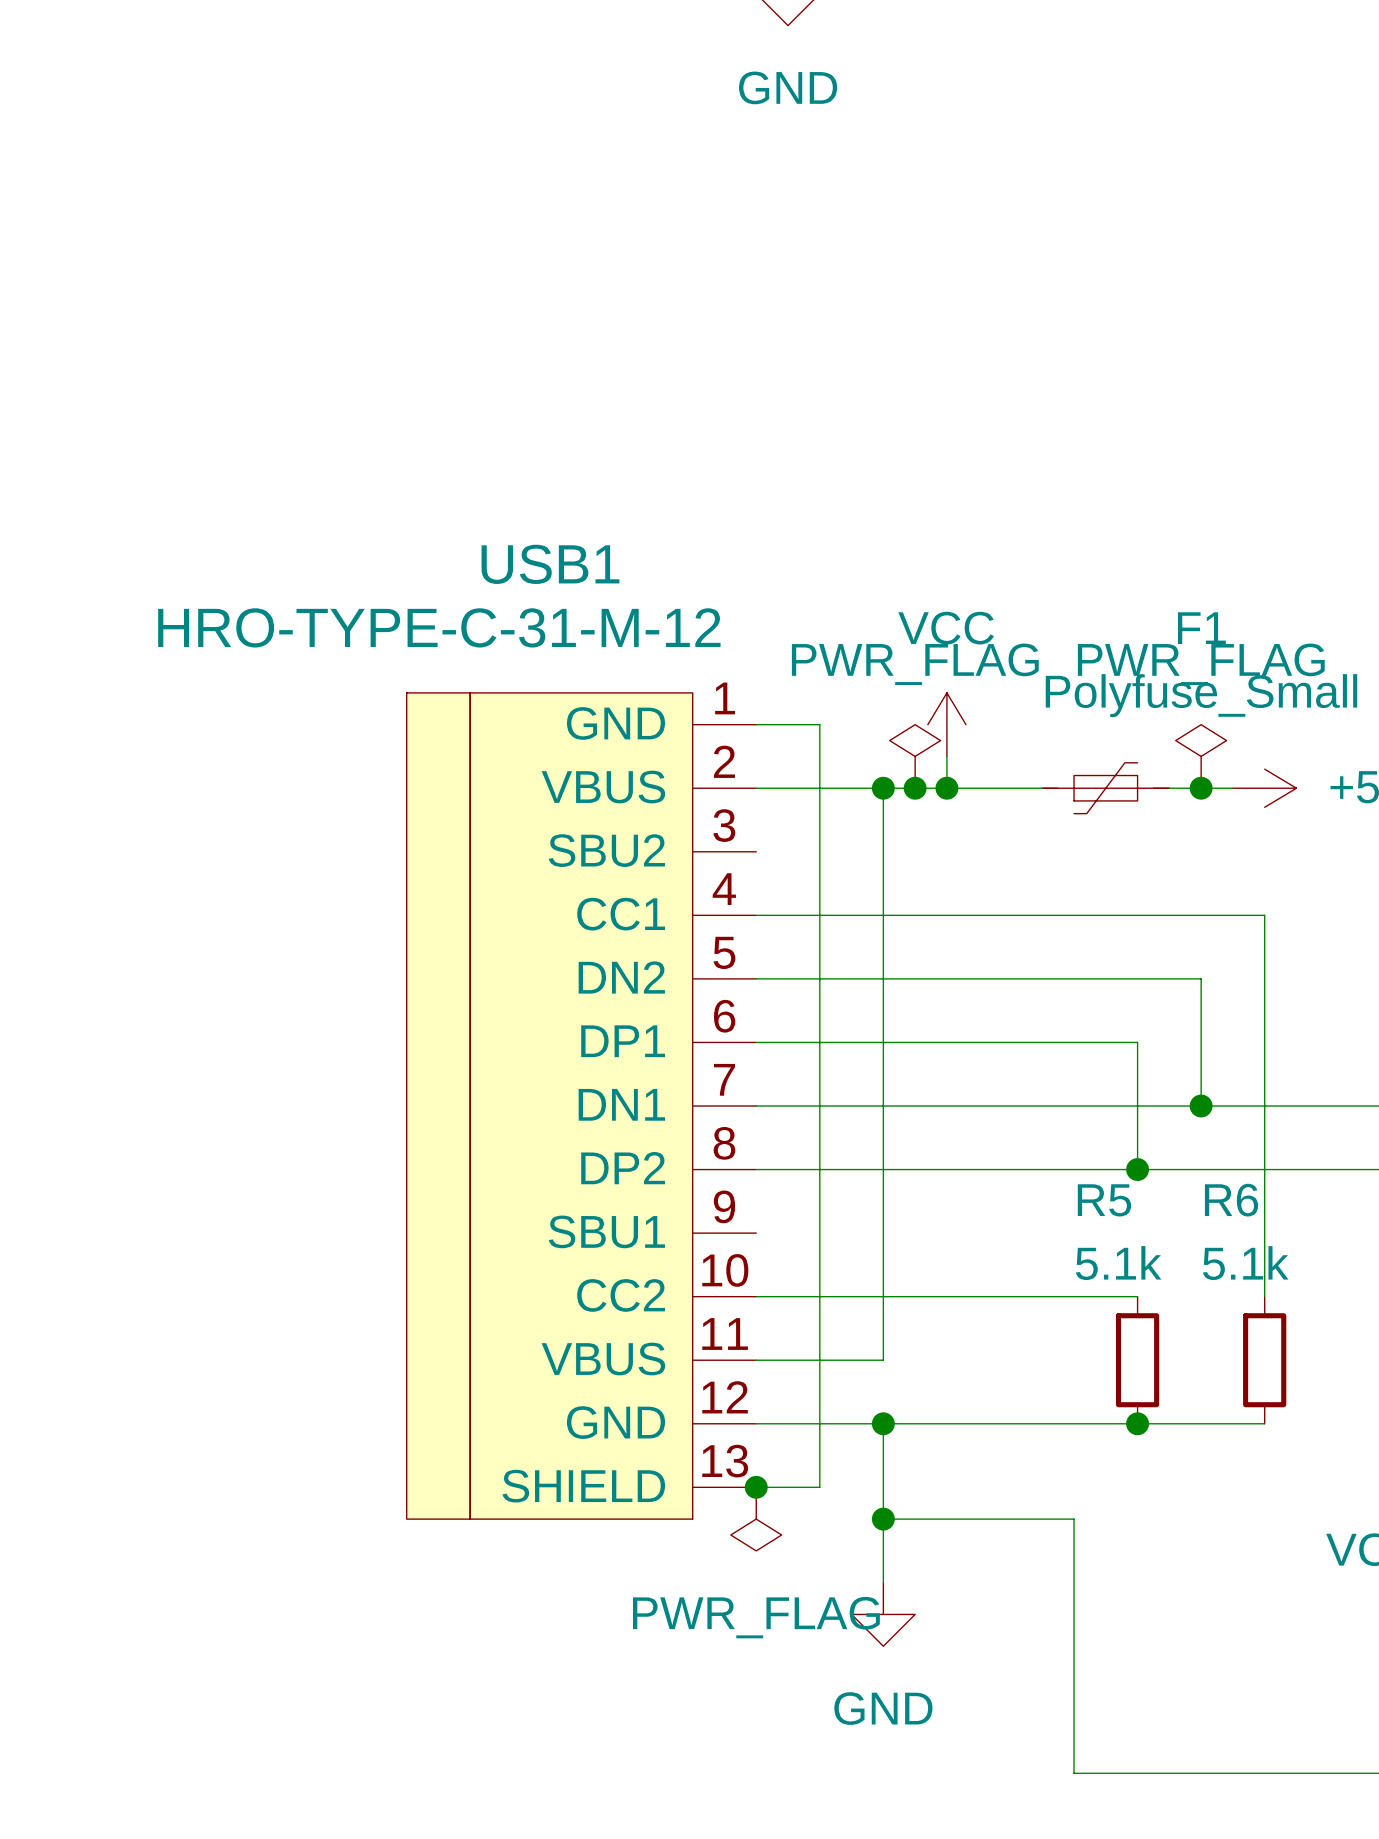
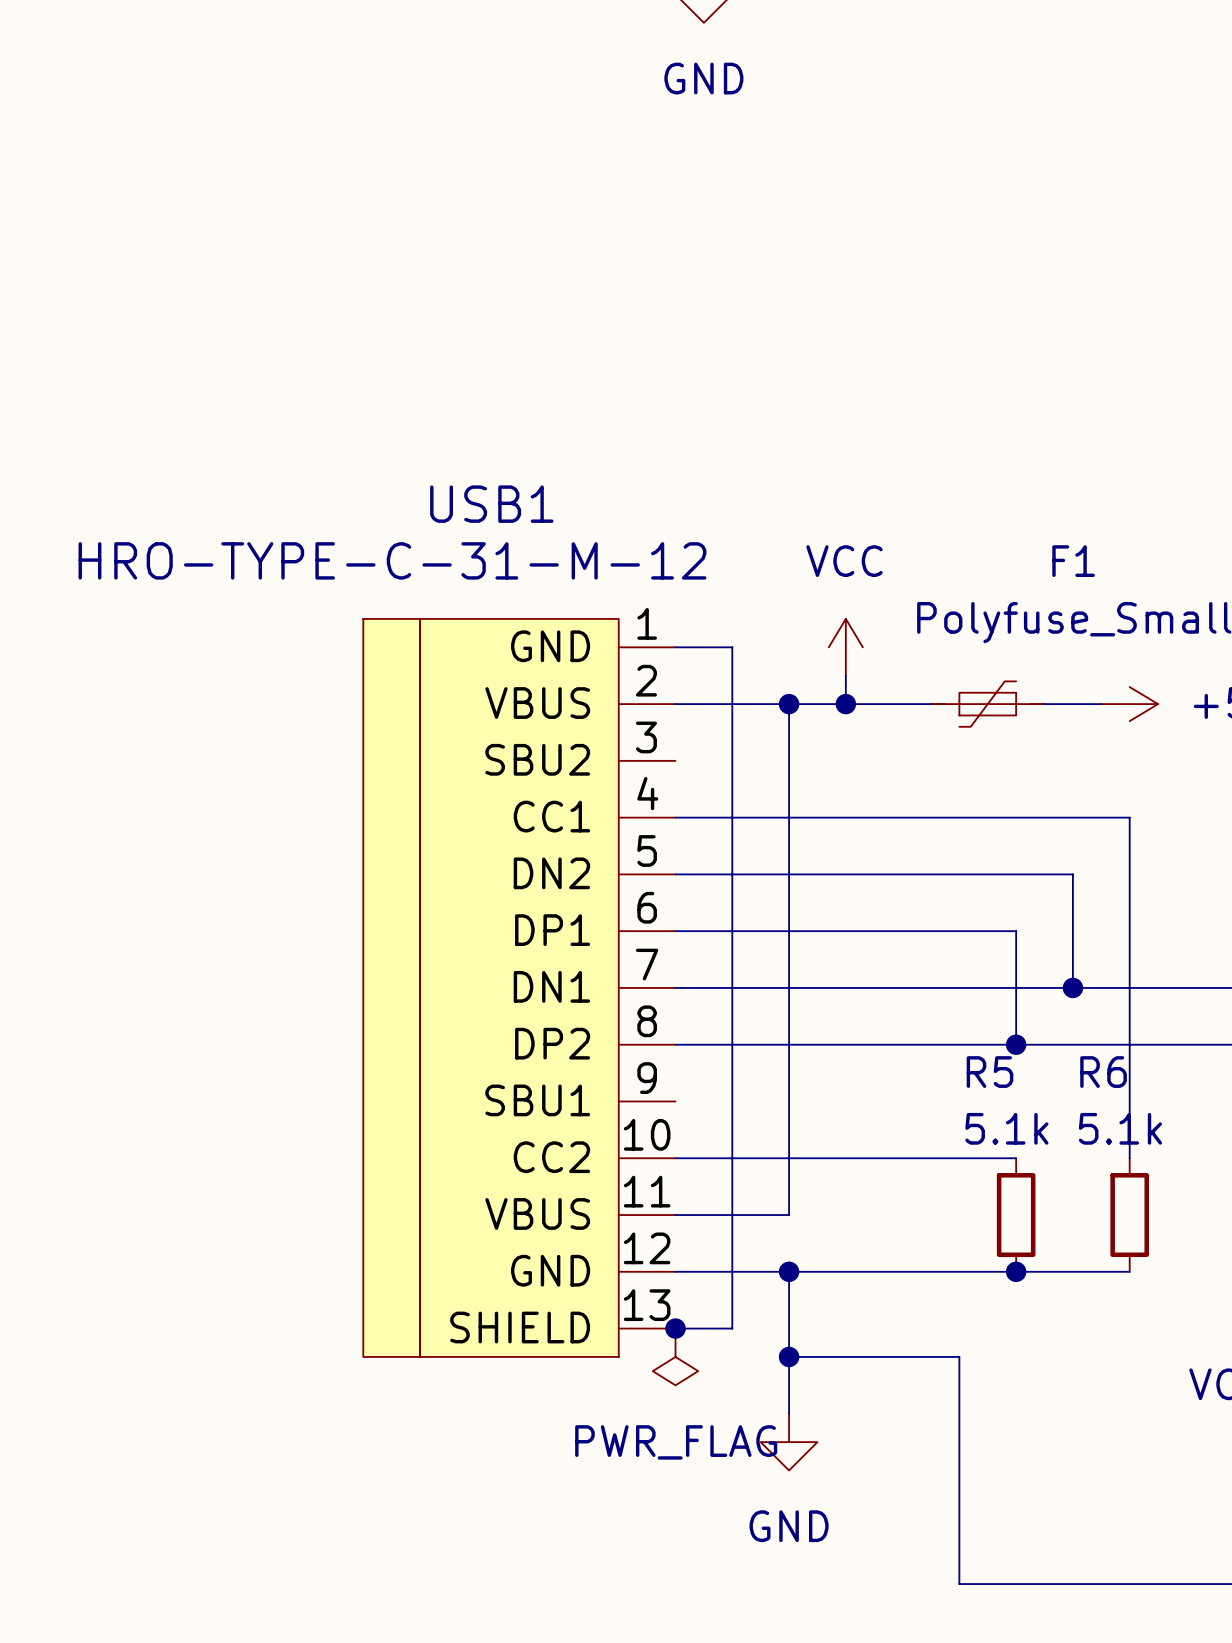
power symbol: PWR_FLAG (915, 756) -> none
power symbol: PWR_FLAG (1201, 756) -> none
junction: (915, 788) -> none
junction: (1201, 788) -> none

